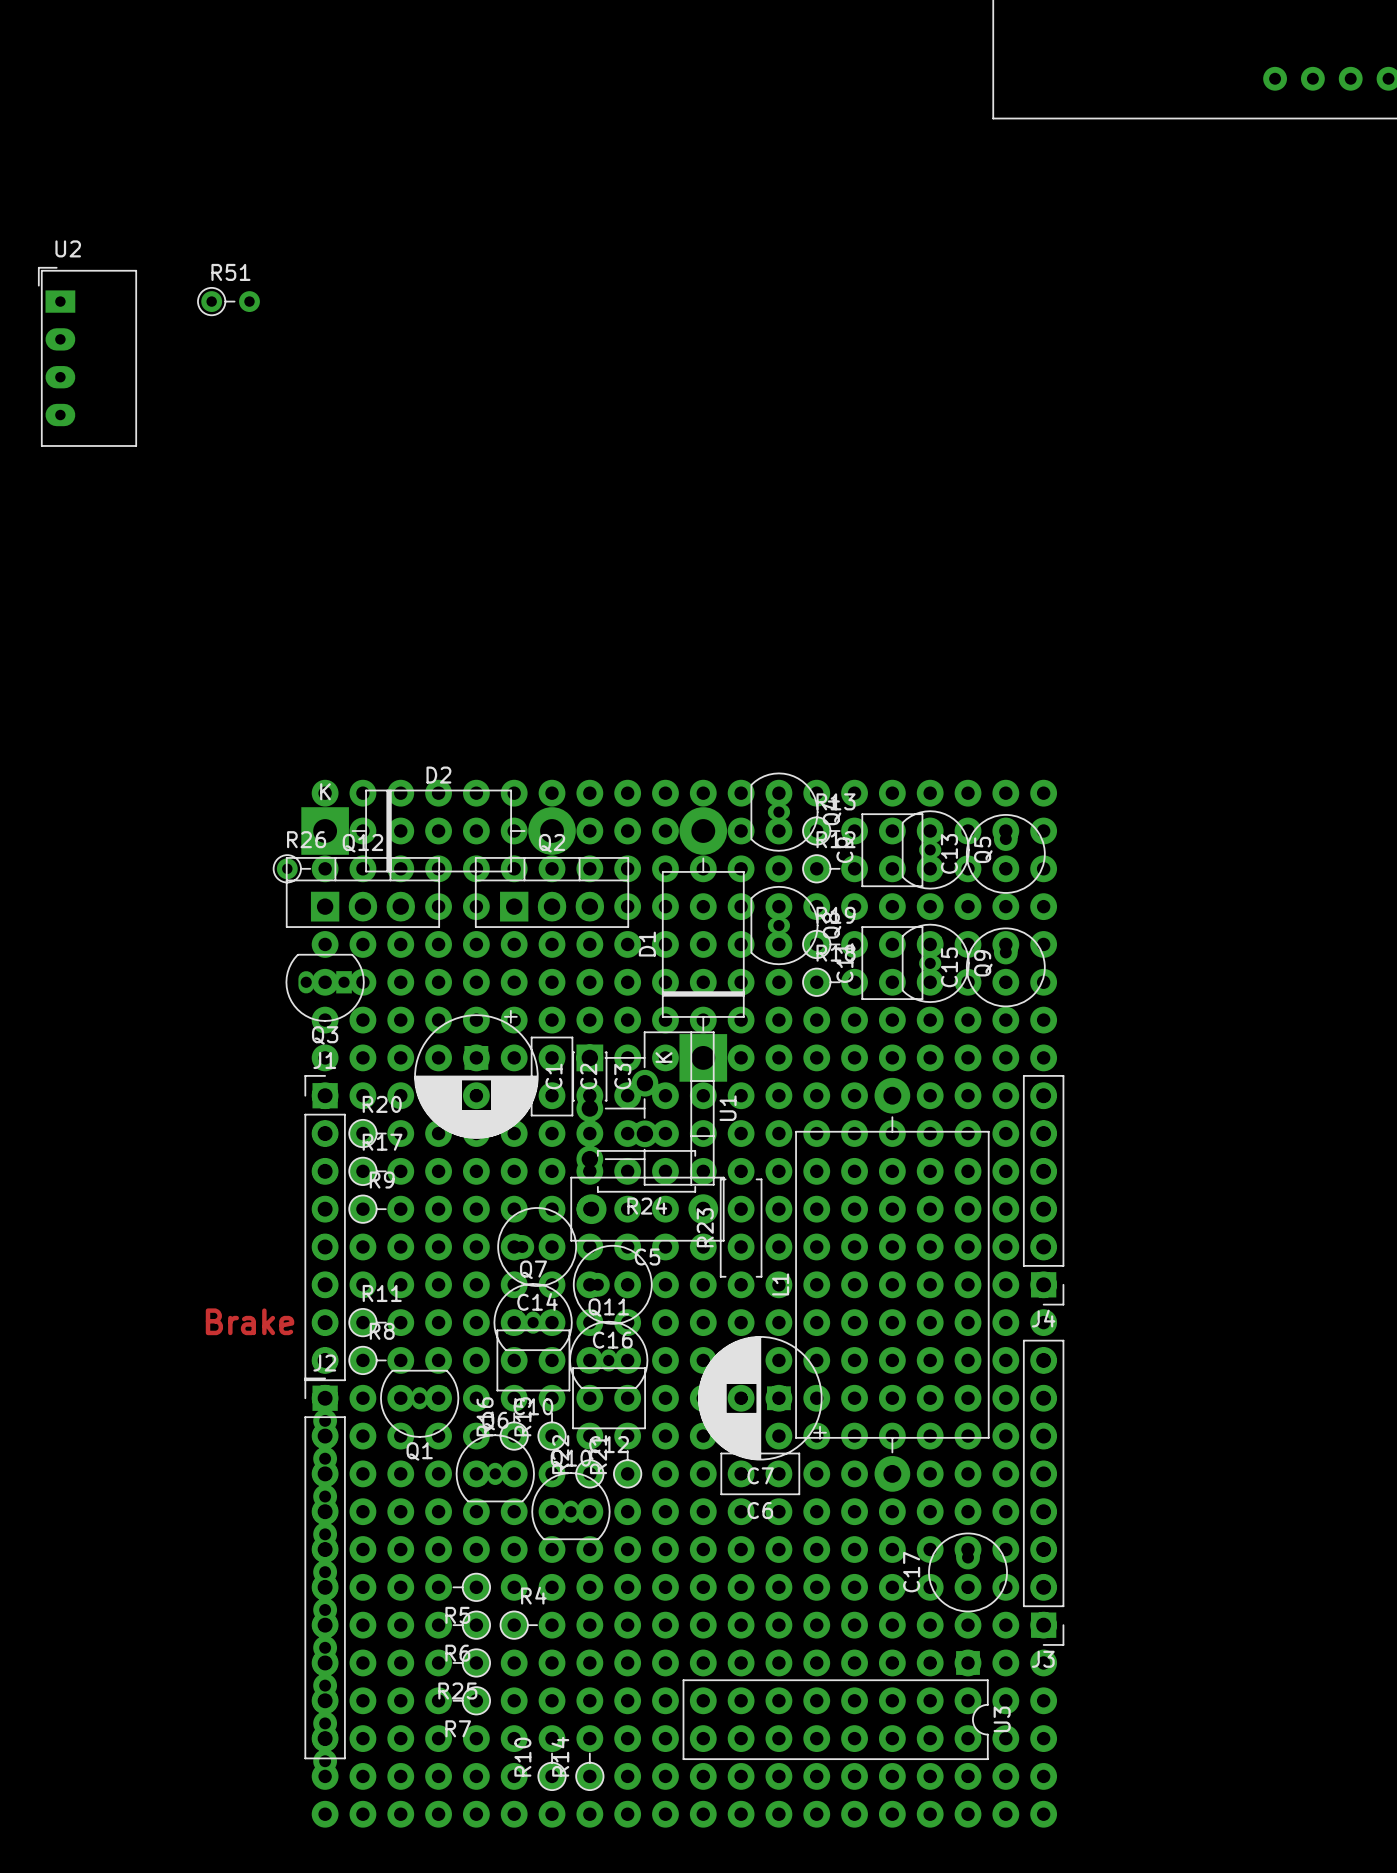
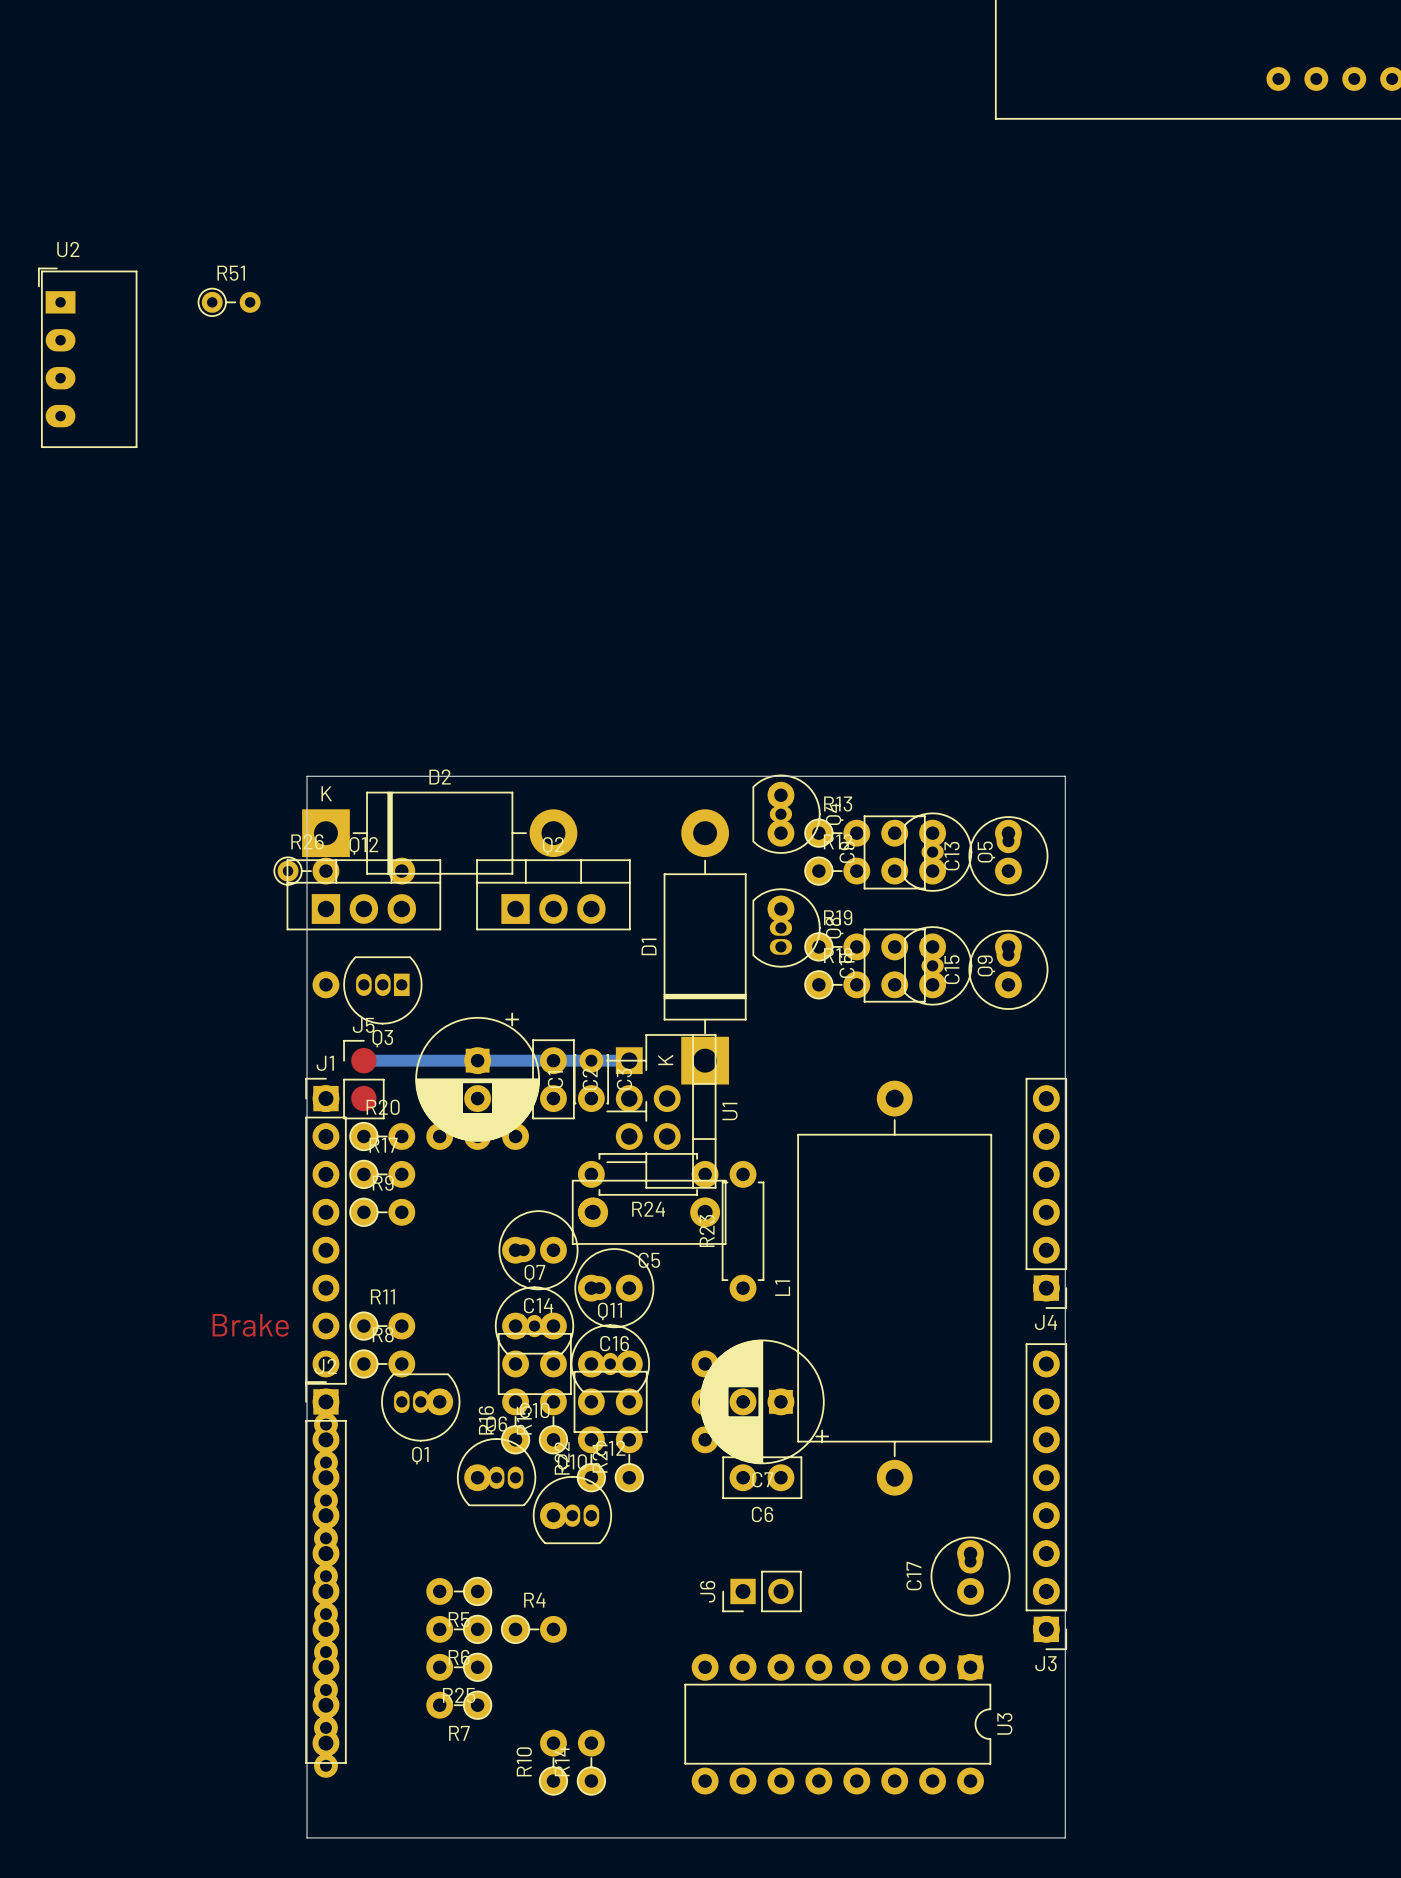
board edge: none -> (307, 776) (307, 1837) (1065, 1837) (1065, 776) (307, 776)
part: (325, 793) -> none
part: (362, 793) -> none
part: (400, 793) -> none
part: (438, 793) -> none
part: (476, 793) -> none
part: (514, 793) -> none
part: (552, 793) -> none
part: (589, 793) -> none
part: (627, 793) -> none
part: (665, 793) -> none
part: (703, 793) -> none
part: (741, 793) -> none
part: (816, 793) -> none
part: (854, 793) -> none
part: (892, 793) -> none
part: (930, 793) -> none
part: (968, 793) -> none
part: (1005, 793) -> none
part: (1043, 793) -> none
part: (362, 831) -> none
part: (400, 831) -> none
part: (438, 831) -> none
part: (476, 831) -> none
part: (514, 831) -> none
part: (589, 831) -> none
part: (627, 831) -> none
part: (665, 831) -> none
part: (741, 831) -> none
part: (968, 831) -> none
part: (1043, 831) -> none
part: (362, 868) -> none
part: (438, 868) -> none
part: (476, 868) -> none
part: (514, 868) -> none
part: (552, 868) -> none
part: (589, 868) -> none
part: (627, 868) -> none
part: (665, 868) -> none
part: (703, 868) -> none
part: (741, 868) -> none
part: (778, 868) -> none
part: (968, 868) -> none
part: (1043, 868) -> none
part: (438, 906) -> none
part: (476, 906) -> none
part: (627, 906) -> none
part: (665, 906) -> none
part: (703, 906) -> none
part: (741, 906) -> none
part: (816, 906) -> none
part: (854, 906) -> none
part: (892, 906) -> none
part: (930, 906) -> none
part: (968, 906) -> none
part: (1005, 906) -> none
part: (1043, 906) -> none
part: (325, 944) -> none
part: (362, 944) -> none
part: (400, 944) -> none
part: (438, 944) -> none
part: (476, 944) -> none
part: (514, 944) -> none
part: (552, 944) -> none
part: (589, 944) -> none
part: (627, 944) -> none
part: (665, 944) -> none
part: (703, 944) -> none
part: (741, 944) -> none
part: (778, 944) -> none
part: (968, 944) -> none
part: (1043, 944) -> none
part: (362, 982) -> none
part: (400, 982) -> none
part: (438, 982) -> none
part: (476, 982) -> none
part: (514, 982) -> none
part: (552, 982) -> none
part: (589, 982) -> none
part: (627, 982) -> none
part: (665, 982) -> none
part: (703, 982) -> none
part: (741, 982) -> none
part: (778, 982) -> none
part: (968, 982) -> none
part: (1043, 982) -> none
Q3 position: (325, 987) -> (382, 990)
part: (325, 1020) -> none
part: (362, 1020) -> none
part: (400, 1020) -> none
part: (438, 1020) -> none
part: (476, 1020) -> none
part: (514, 1020) -> none
part: (552, 1020) -> none
part: (589, 1020) -> none
part: (627, 1020) -> none
part: (665, 1020) -> none
part: (703, 1020) -> none
part: (741, 1020) -> none
part: (778, 1020) -> none
part: (816, 1020) -> none
part: (854, 1020) -> none
part: (892, 1020) -> none
part: (930, 1020) -> none
part: (968, 1020) -> none
part: (1005, 1020) -> none
part: (1043, 1020) -> none
U1 footprint: [576, 1031, 715, 1186] -> [606, 1034, 717, 1189]
part: (325, 1057) -> none
bottom track: none -> (363, 1060) (629, 1060)
part: (362, 1057) -> none
part: (400, 1057) -> none
part: (438, 1057) -> none
part: (514, 1057) -> none
part: (627, 1057) -> none
part: (665, 1057) -> none
part: (741, 1057) -> none
part: (778, 1057) -> none
part: (816, 1057) -> none
part: (854, 1057) -> none
part: (892, 1057) -> none
part: (930, 1057) -> none
part: (968, 1057) -> none
part: (1005, 1057) -> none
part: (1043, 1057) -> none
J5: none -> (363, 1079)
part: (362, 1095) -> none
part: (400, 1095) -> none
part: (627, 1095) -> none
part: (665, 1095) -> none
part: (703, 1095) -> none
part: (741, 1095) -> none
part: (778, 1095) -> none
part: (816, 1095) -> none
part: (854, 1095) -> none
part: (930, 1095) -> none
part: (968, 1095) -> none
part: (1005, 1095) -> none
part: (552, 1133) -> none
part: (589, 1133) -> none
part: (627, 1133) -> none
part: (665, 1133) -> none
part: (703, 1133) -> none
part: (741, 1133) -> none
part: (778, 1133) -> none
part: (816, 1133) -> none
part: (854, 1133) -> none
part: (892, 1133) -> none
part: (930, 1133) -> none
part: (968, 1133) -> none
part: (1005, 1133) -> none
part: (438, 1171) -> none
part: (476, 1171) -> none
part: (514, 1171) -> none
part: (552, 1171) -> none
part: (627, 1171) -> none
part: (665, 1171) -> none
part: (778, 1171) -> none
part: (816, 1171) -> none
part: (854, 1171) -> none
part: (892, 1171) -> none
part: (930, 1171) -> none
part: (968, 1171) -> none
part: (1005, 1171) -> none
part: (438, 1209) -> none
part: (476, 1209) -> none
part: (514, 1209) -> none
part: (552, 1209) -> none
part: (627, 1209) -> none
part: (665, 1209) -> none
part: (741, 1209) -> none
part: (778, 1209) -> none
part: (816, 1209) -> none
part: (854, 1209) -> none
part: (892, 1209) -> none
part: (930, 1209) -> none
part: (968, 1209) -> none
part: (1005, 1209) -> none
part: (362, 1246) -> none
part: (400, 1246) -> none
part: (438, 1246) -> none
part: (476, 1246) -> none
part: (589, 1246) -> none
part: (627, 1246) -> none
part: (665, 1246) -> none
part: (703, 1246) -> none
part: (741, 1246) -> none
part: (778, 1246) -> none
part: (816, 1246) -> none
part: (854, 1246) -> none
part: (892, 1246) -> none
part: (930, 1246) -> none
part: (968, 1246) -> none
part: (1005, 1246) -> none
part: (362, 1284) -> none
part: (400, 1284) -> none
part: (438, 1284) -> none
part: (476, 1284) -> none
part: (514, 1284) -> none
part: (552, 1284) -> none
part: (665, 1284) -> none
part: (703, 1284) -> none
part: (778, 1284) -> none
part: (816, 1284) -> none
part: (854, 1284) -> none
part: (892, 1284) -> none
part: (930, 1284) -> none
part: (968, 1284) -> none
part: (1005, 1284) -> none
part: (438, 1322) -> none
part: (476, 1322) -> none
part: (589, 1322) -> none
part: (627, 1322) -> none
part: (665, 1322) -> none
part: (703, 1322) -> none
part: (741, 1322) -> none
part: (778, 1322) -> none
part: (816, 1322) -> none
part: (854, 1322) -> none
part: (892, 1322) -> none
part: (930, 1322) -> none
part: (968, 1322) -> none
part: (1005, 1322) -> none
part: (1043, 1322) -> none
part: (438, 1360) -> none
part: (476, 1360) -> none
part: (665, 1360) -> none
part: (778, 1360) -> none
part: (816, 1360) -> none
part: (854, 1360) -> none
part: (892, 1360) -> none
part: (930, 1360) -> none
part: (968, 1360) -> none
part: (1005, 1360) -> none
part: (362, 1398) -> none
part: (400, 1398) -> none
part: (476, 1398) -> none
part: (665, 1398) -> none
part: (816, 1398) -> none
part: (854, 1398) -> none
part: (892, 1398) -> none
part: (930, 1398) -> none
part: (968, 1398) -> none
part: (1005, 1398) -> none
part: (362, 1436) -> none
part: (400, 1436) -> none
part: (438, 1436) -> none
part: (476, 1436) -> none
part: (665, 1436) -> none
part: (778, 1436) -> none
part: (816, 1436) -> none
part: (854, 1436) -> none
part: (892, 1436) -> none
part: (930, 1436) -> none
part: (968, 1436) -> none
part: (1005, 1436) -> none
part: (362, 1473) -> none
part: (400, 1473) -> none
part: (438, 1473) -> none
part: (514, 1473) -> none
part: (552, 1473) -> none
part: (665, 1473) -> none
part: (703, 1473) -> none
part: (816, 1473) -> none
part: (854, 1473) -> none
part: (930, 1473) -> none
part: (968, 1473) -> none
part: (1005, 1473) -> none
part: (362, 1511) -> none
part: (400, 1511) -> none
part: (438, 1511) -> none
part: (476, 1511) -> none
part: (514, 1511) -> none
part: (589, 1511) -> none
part: (627, 1511) -> none
part: (665, 1511) -> none
part: (703, 1511) -> none
part: (741, 1511) -> none
part: (778, 1511) -> none
part: (816, 1511) -> none
part: (854, 1511) -> none
part: (892, 1511) -> none
part: (930, 1511) -> none
part: (968, 1511) -> none
part: (1005, 1511) -> none
part: (362, 1549) -> none
part: (400, 1549) -> none
part: (438, 1549) -> none
part: (476, 1549) -> none
part: (514, 1549) -> none
part: (552, 1549) -> none
part: (589, 1549) -> none
part: (627, 1549) -> none
part: (665, 1549) -> none
part: (703, 1549) -> none
part: (741, 1549) -> none
part: (778, 1549) -> none
part: (816, 1549) -> none
part: (854, 1549) -> none
part: (892, 1549) -> none
part: (930, 1549) -> none
part: (1005, 1549) -> none
part: (362, 1587) -> none
part: (400, 1587) -> none
part: (514, 1587) -> none
part: (552, 1587) -> none
part: (589, 1587) -> none
part: (627, 1587) -> none
part: (665, 1587) -> none
part: (703, 1587) -> none
part: (741, 1587) -> none
J6: none -> (761, 1591)
part: (778, 1587) -> none
part: (816, 1587) -> none
part: (854, 1587) -> none
part: (892, 1587) -> none
part: (930, 1587) -> none
part: (1005, 1587) -> none
part: (362, 1625) -> none
part: (400, 1625) -> none
part: (589, 1625) -> none
part: (627, 1625) -> none
part: (665, 1625) -> none
part: (703, 1625) -> none
part: (741, 1625) -> none
part: (778, 1625) -> none
part: (816, 1625) -> none
part: (854, 1625) -> none
part: (892, 1625) -> none
part: (930, 1625) -> none
part: (968, 1625) -> none
part: (1005, 1625) -> none
part: (362, 1662) -> none
part: (400, 1662) -> none
part: (514, 1662) -> none
part: (552, 1662) -> none
part: (589, 1662) -> none
part: (627, 1662) -> none
part: (665, 1662) -> none
part: (1005, 1662) -> none
part: (1043, 1662) -> none
part: (362, 1700) -> none
part: (400, 1700) -> none
part: (514, 1700) -> none
part: (552, 1700) -> none
part: (589, 1700) -> none
part: (627, 1700) -> none
part: (665, 1700) -> none
part: (703, 1700) -> none
part: (741, 1700) -> none
part: (778, 1700) -> none
part: (816, 1700) -> none
part: (854, 1700) -> none
part: (892, 1700) -> none
part: (930, 1700) -> none
part: (968, 1700) -> none
part: (1005, 1700) -> none
part: (1043, 1700) -> none
part: (362, 1738) -> none
part: (400, 1738) -> none
part: (438, 1738) -> none
part: (476, 1738) -> none
part: (514, 1738) -> none
part: (627, 1738) -> none
part: (665, 1738) -> none
part: (703, 1738) -> none
part: (741, 1738) -> none
part: (778, 1738) -> none
part: (816, 1738) -> none
part: (854, 1738) -> none
part: (892, 1738) -> none
part: (930, 1738) -> none
part: (968, 1738) -> none
part: (1005, 1738) -> none
part: (1043, 1738) -> none
part: (325, 1776) -> none
part: (362, 1776) -> none
part: (400, 1776) -> none
part: (438, 1776) -> none
part: (476, 1776) -> none
part: (514, 1776) -> none
part: (627, 1776) -> none
part: (665, 1776) -> none
part: (1005, 1776) -> none
part: (1043, 1776) -> none
part: (325, 1814) -> none
part: (362, 1814) -> none
part: (400, 1814) -> none
part: (438, 1814) -> none
part: (476, 1814) -> none
part: (514, 1814) -> none
part: (552, 1814) -> none
part: (589, 1814) -> none
part: (627, 1814) -> none
part: (665, 1814) -> none
part: (703, 1814) -> none
part: (741, 1814) -> none
part: (778, 1814) -> none
part: (816, 1814) -> none
part: (854, 1814) -> none
part: (892, 1814) -> none
part: (930, 1814) -> none
part: (968, 1814) -> none
part: (1005, 1814) -> none
part: (1043, 1814) -> none

